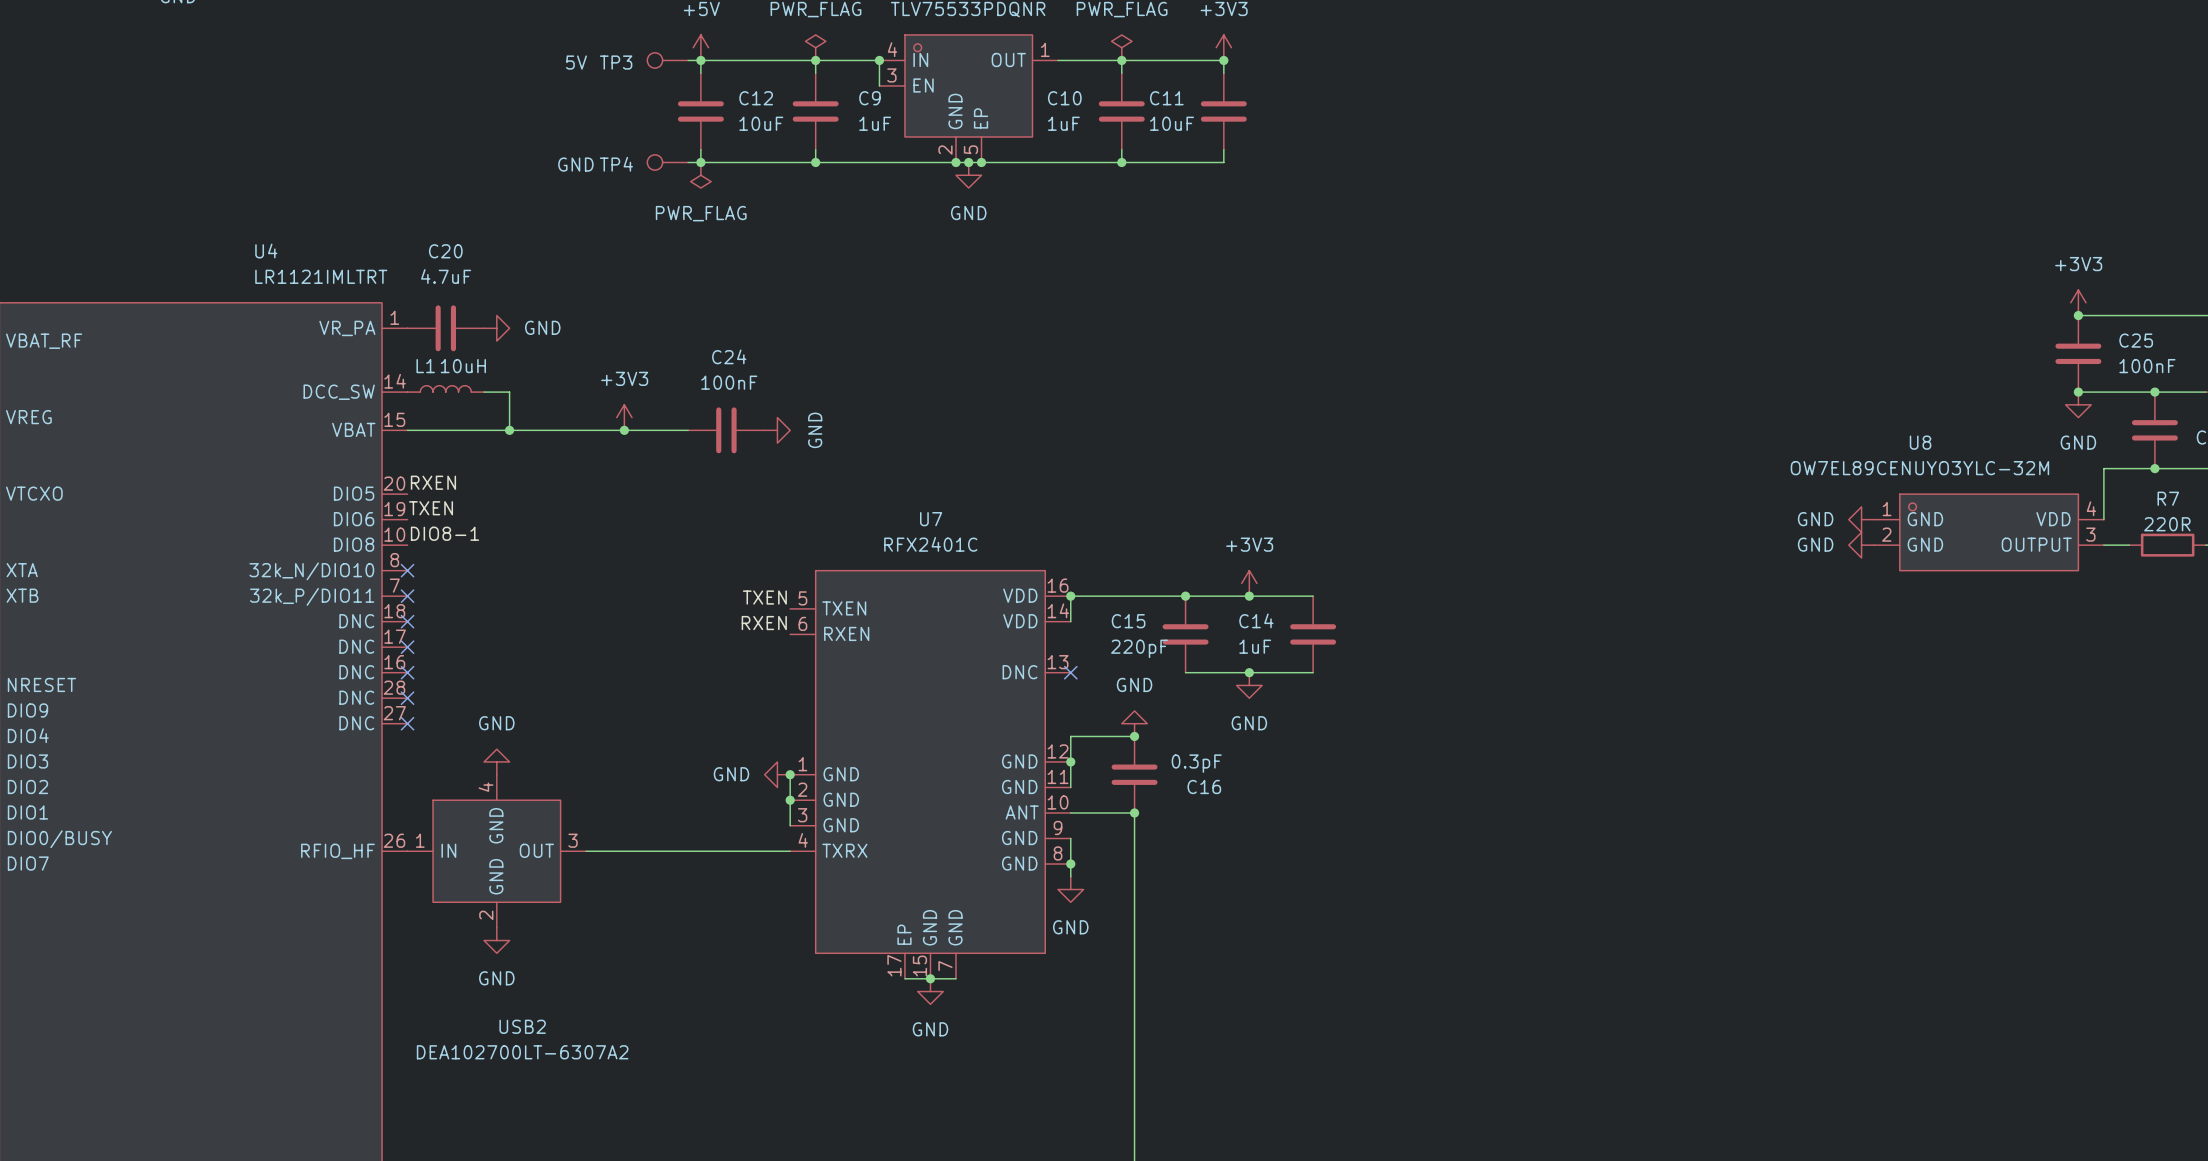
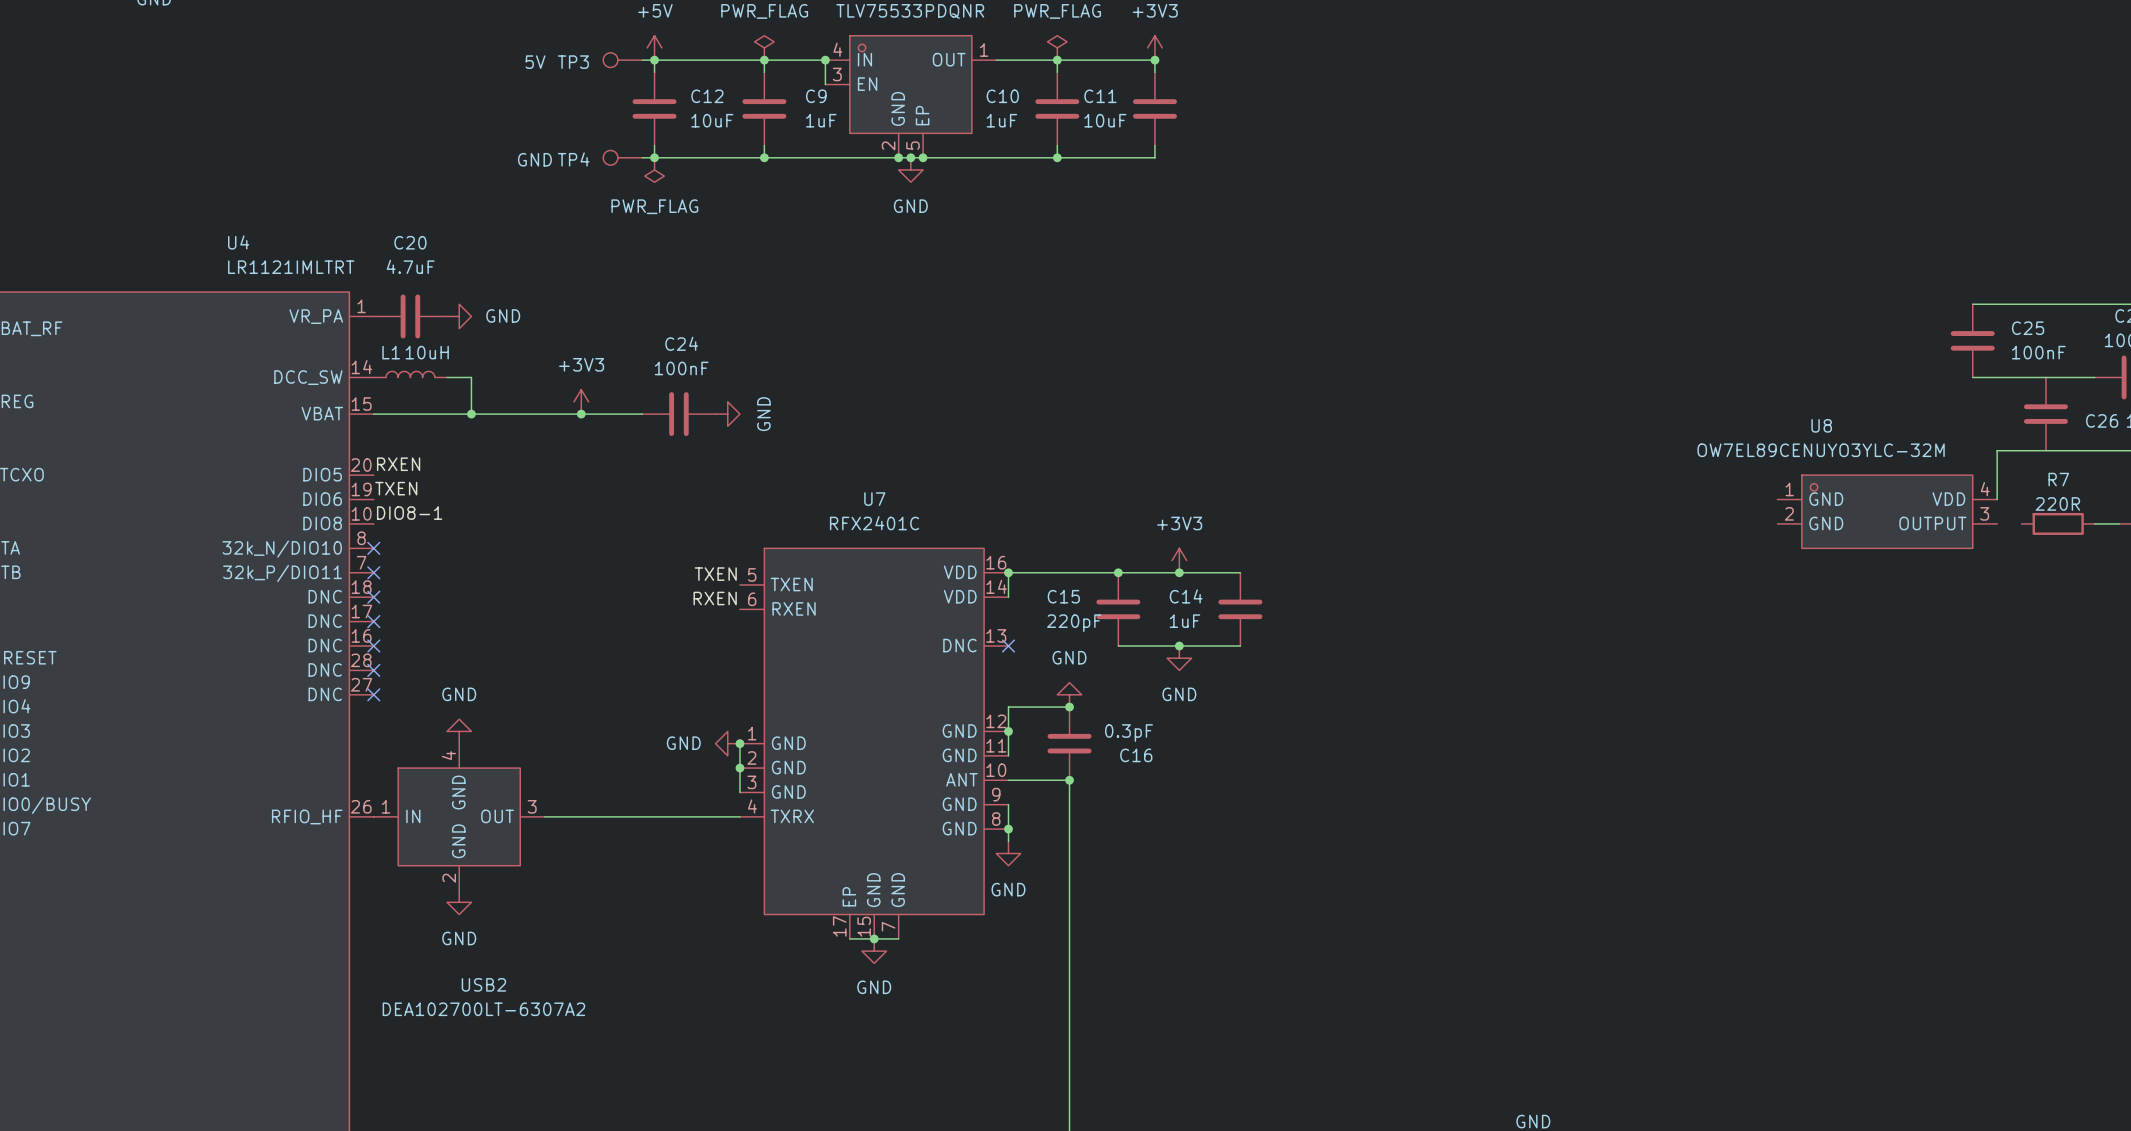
power symbol: +3V3 (2078, 302) -> none
junction: (2078, 315) -> none
junction: (2078, 392) -> none
junction: (2154, 392) -> none
power symbol: GND (2078, 404) -> none
junction: (2154, 468) -> none
power symbol: GND (1861, 519) -> none
power symbol: GND (1861, 545) -> none
wire: (2103, 545) (2129, 545) -> none

